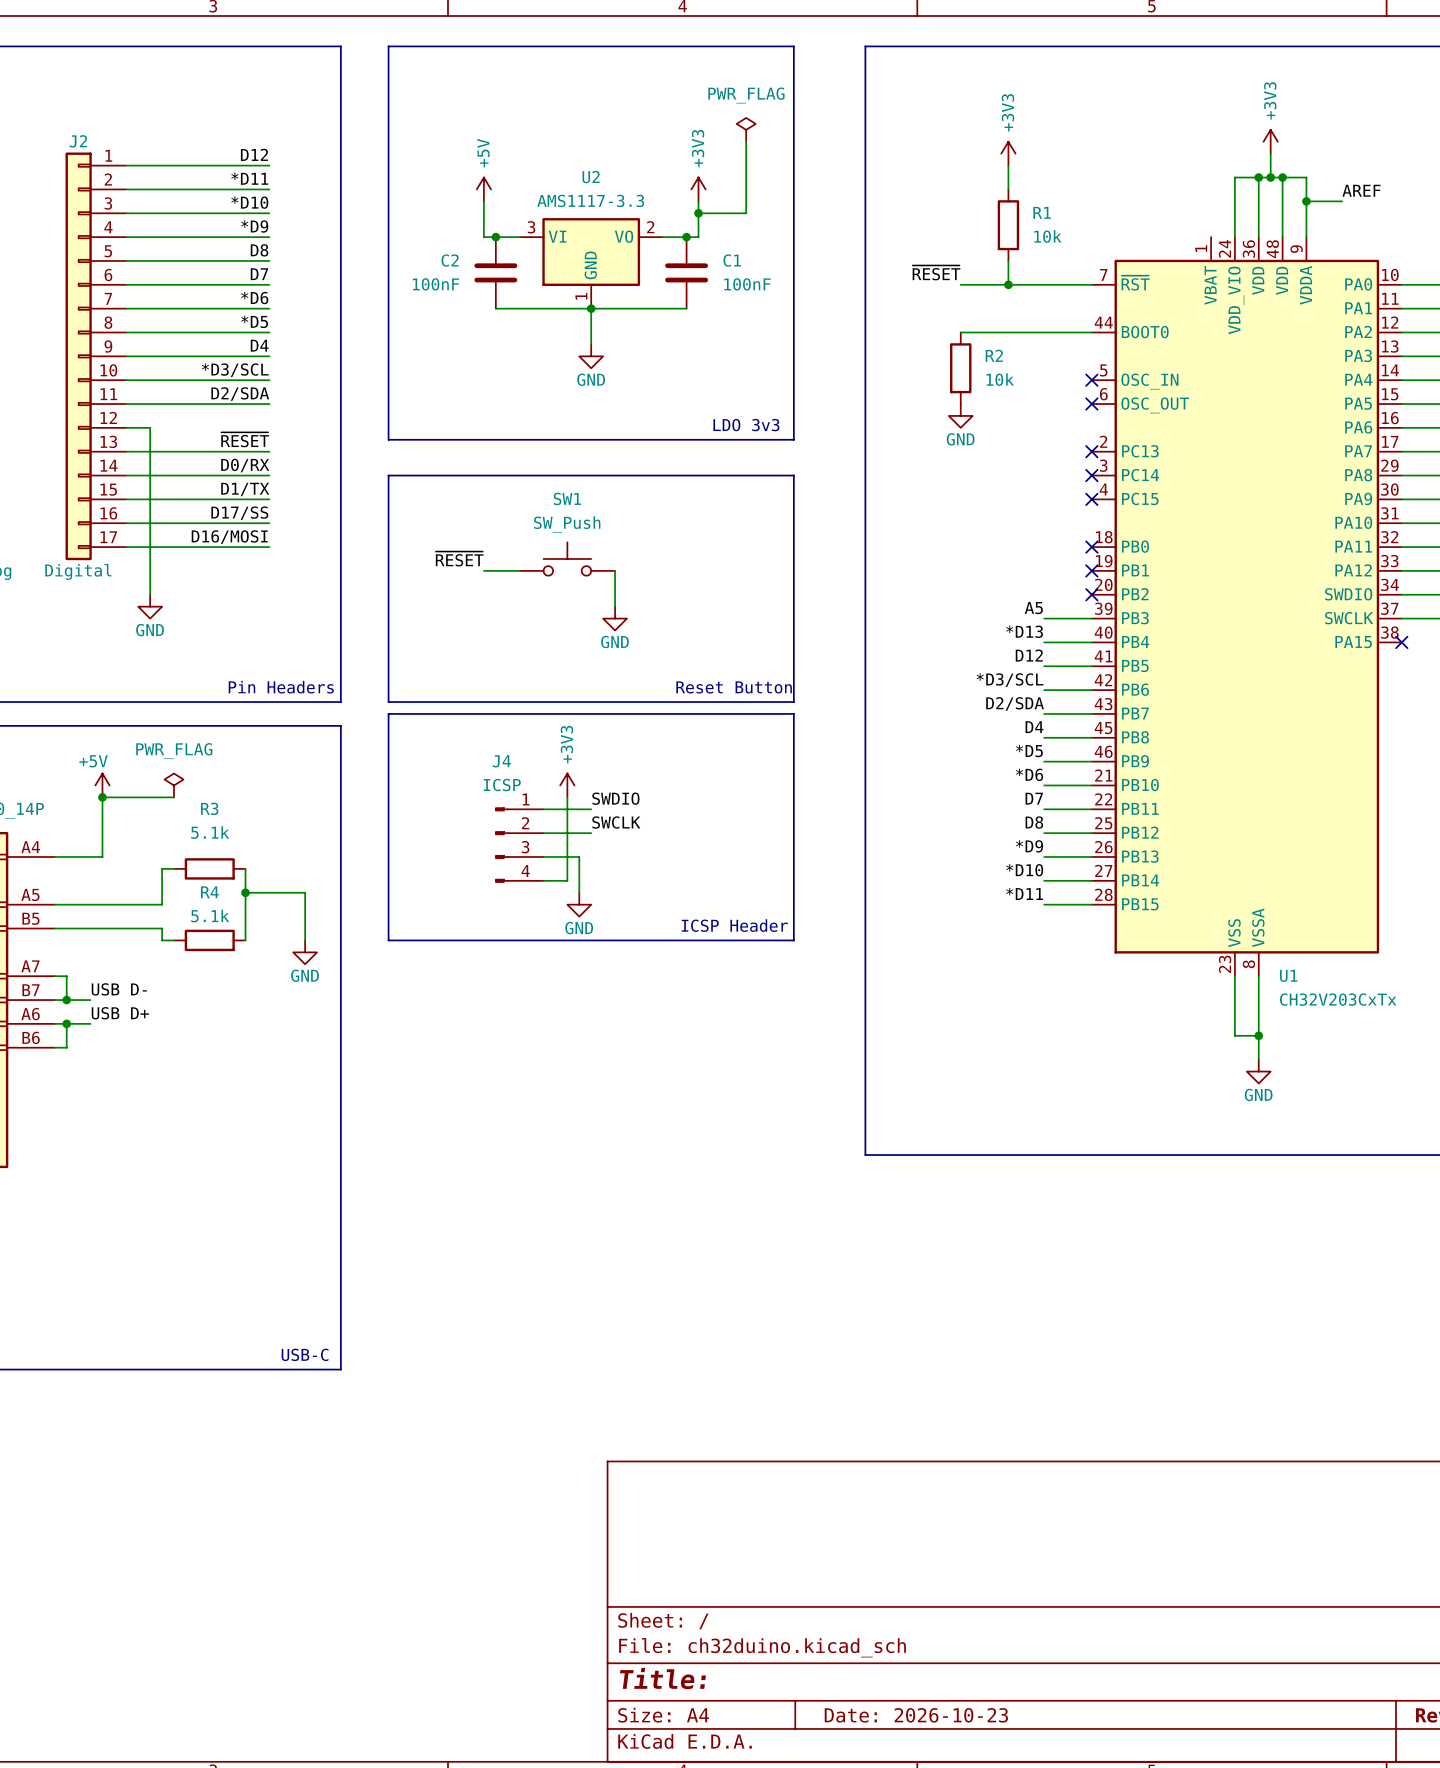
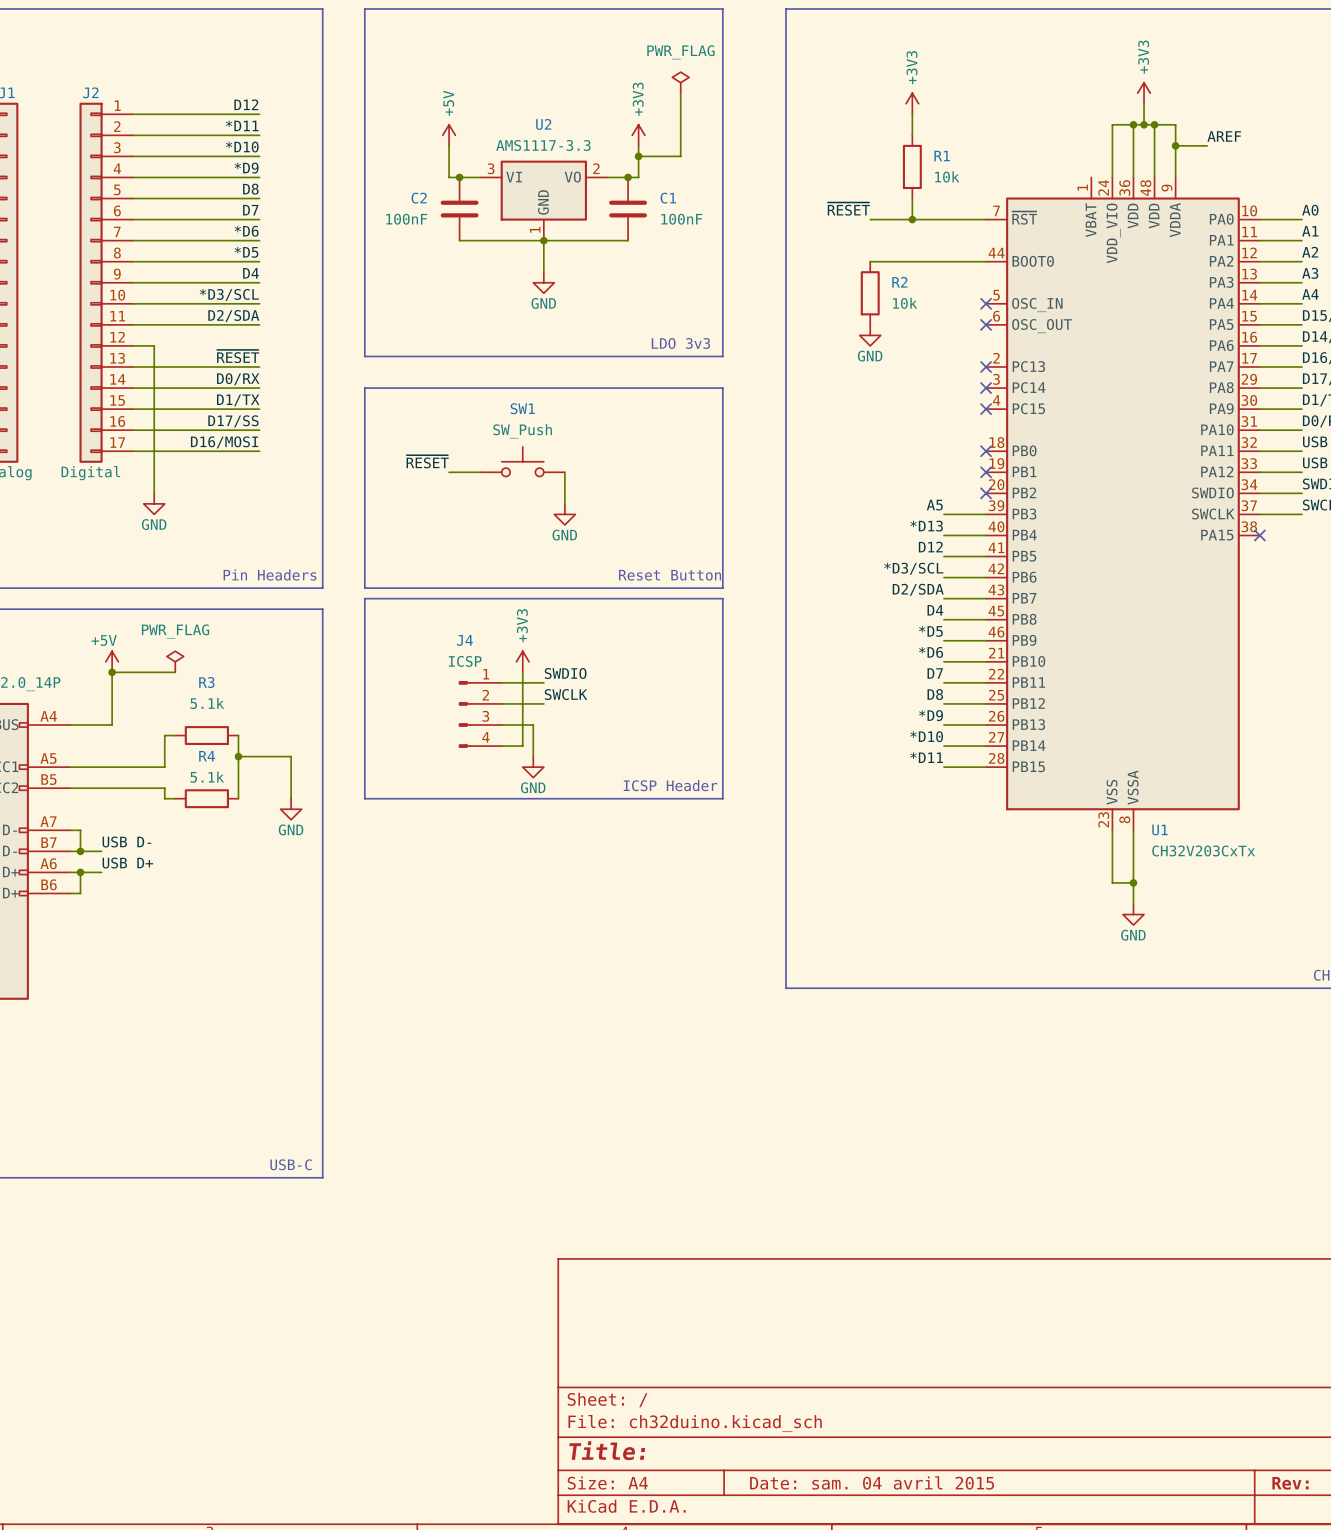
title block: Date: 2026-10-23 (916, 1715) -> Date: sam. 04 avril 2015 (872, 1482)

